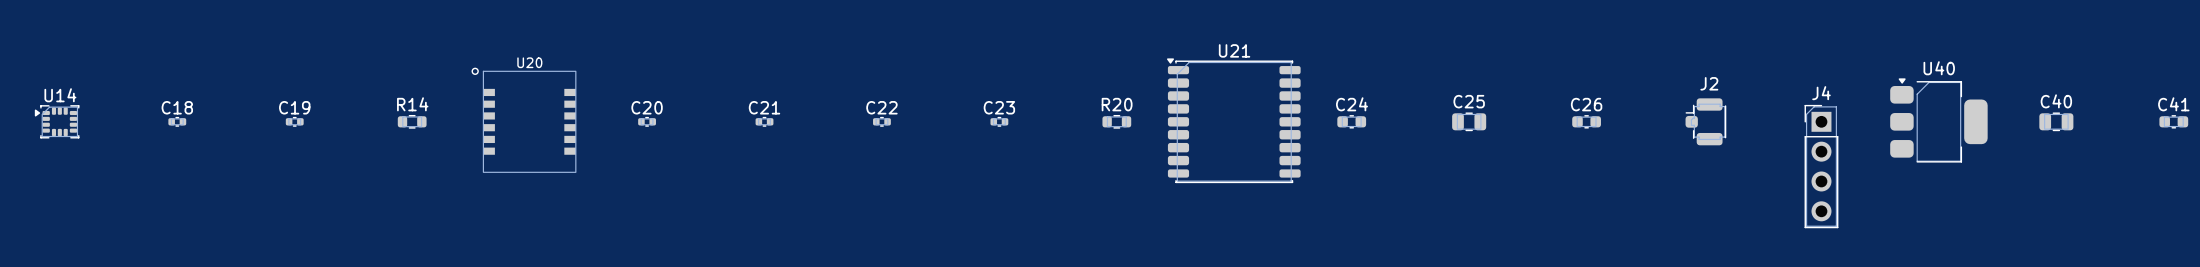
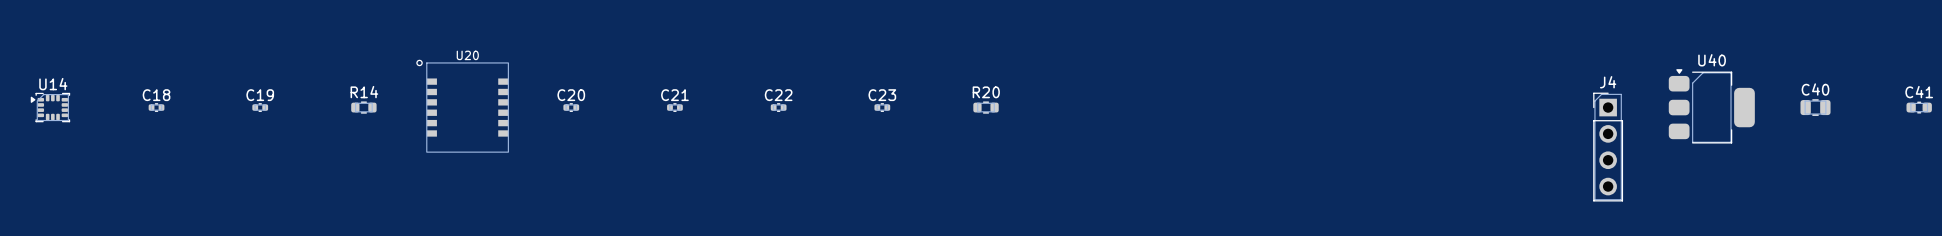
U21: (1233, 120) -> none
C24: (1351, 121) -> none
C25: (1469, 121) -> none
C26: (1586, 121) -> none
J2: (1705, 121) -> none

